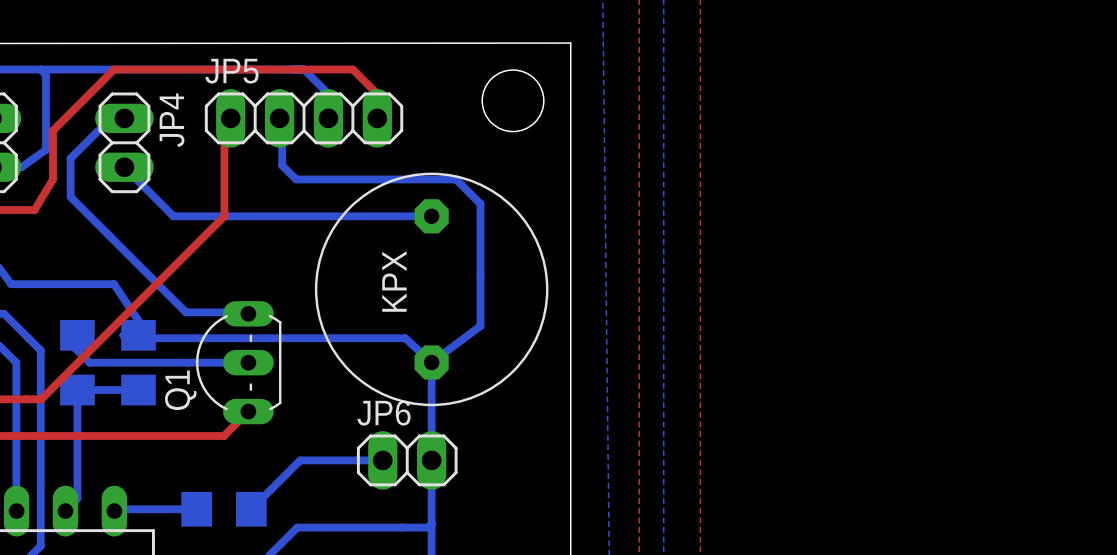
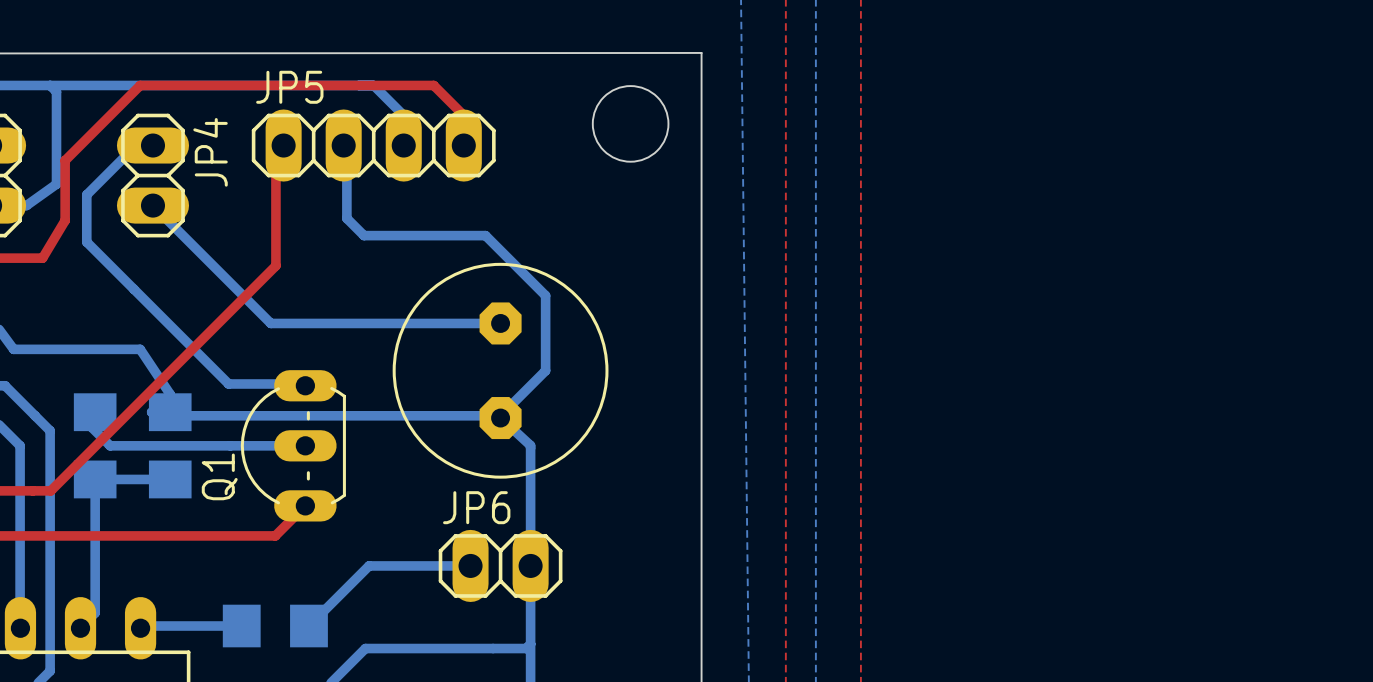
bottom track: (282, 165) (296, 179) (456, 179) (480, 203) (480, 326) (431, 362) -> (346, 203) (346, 218) (364, 235) (485, 235) (545, 295) (545, 370) (500, 415) (500, 418)
bottom track: (173, 216) (431, 216) -> (213, 265) (270, 323) (500, 323)
part: (431, 289) -> none
part: none -> (500, 370)

